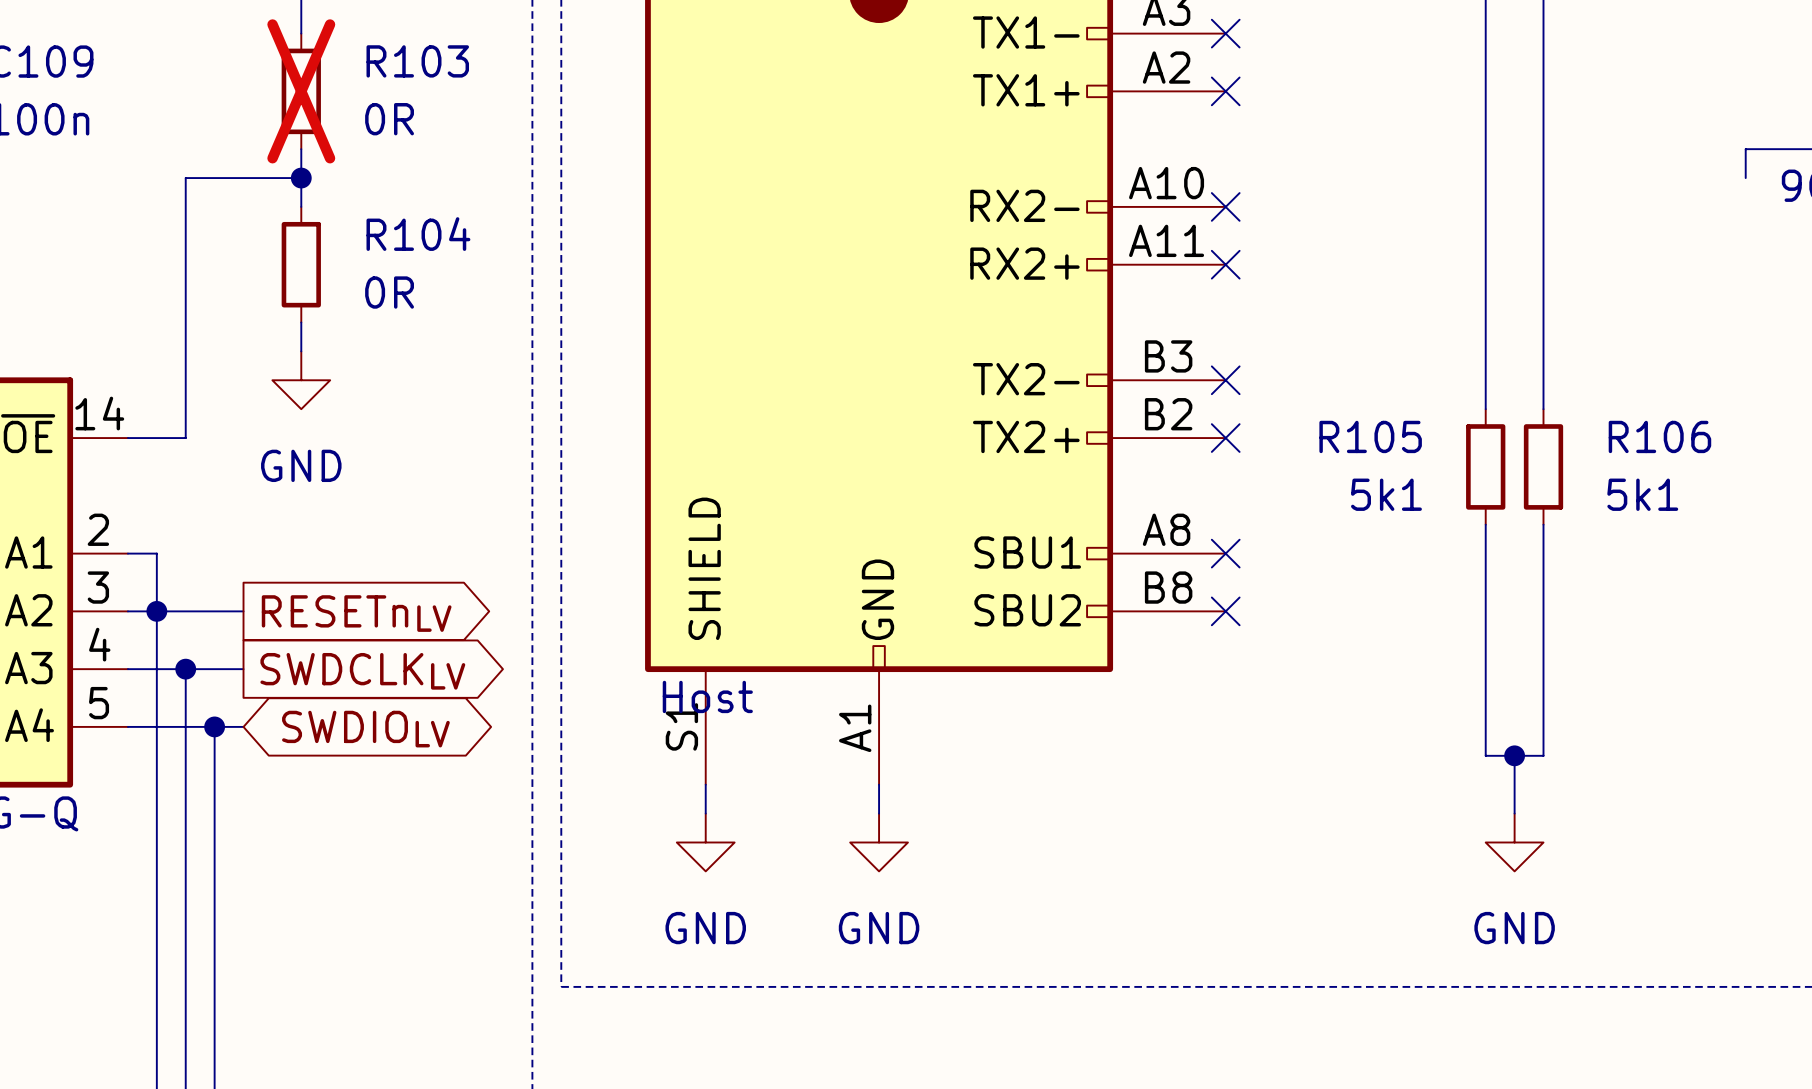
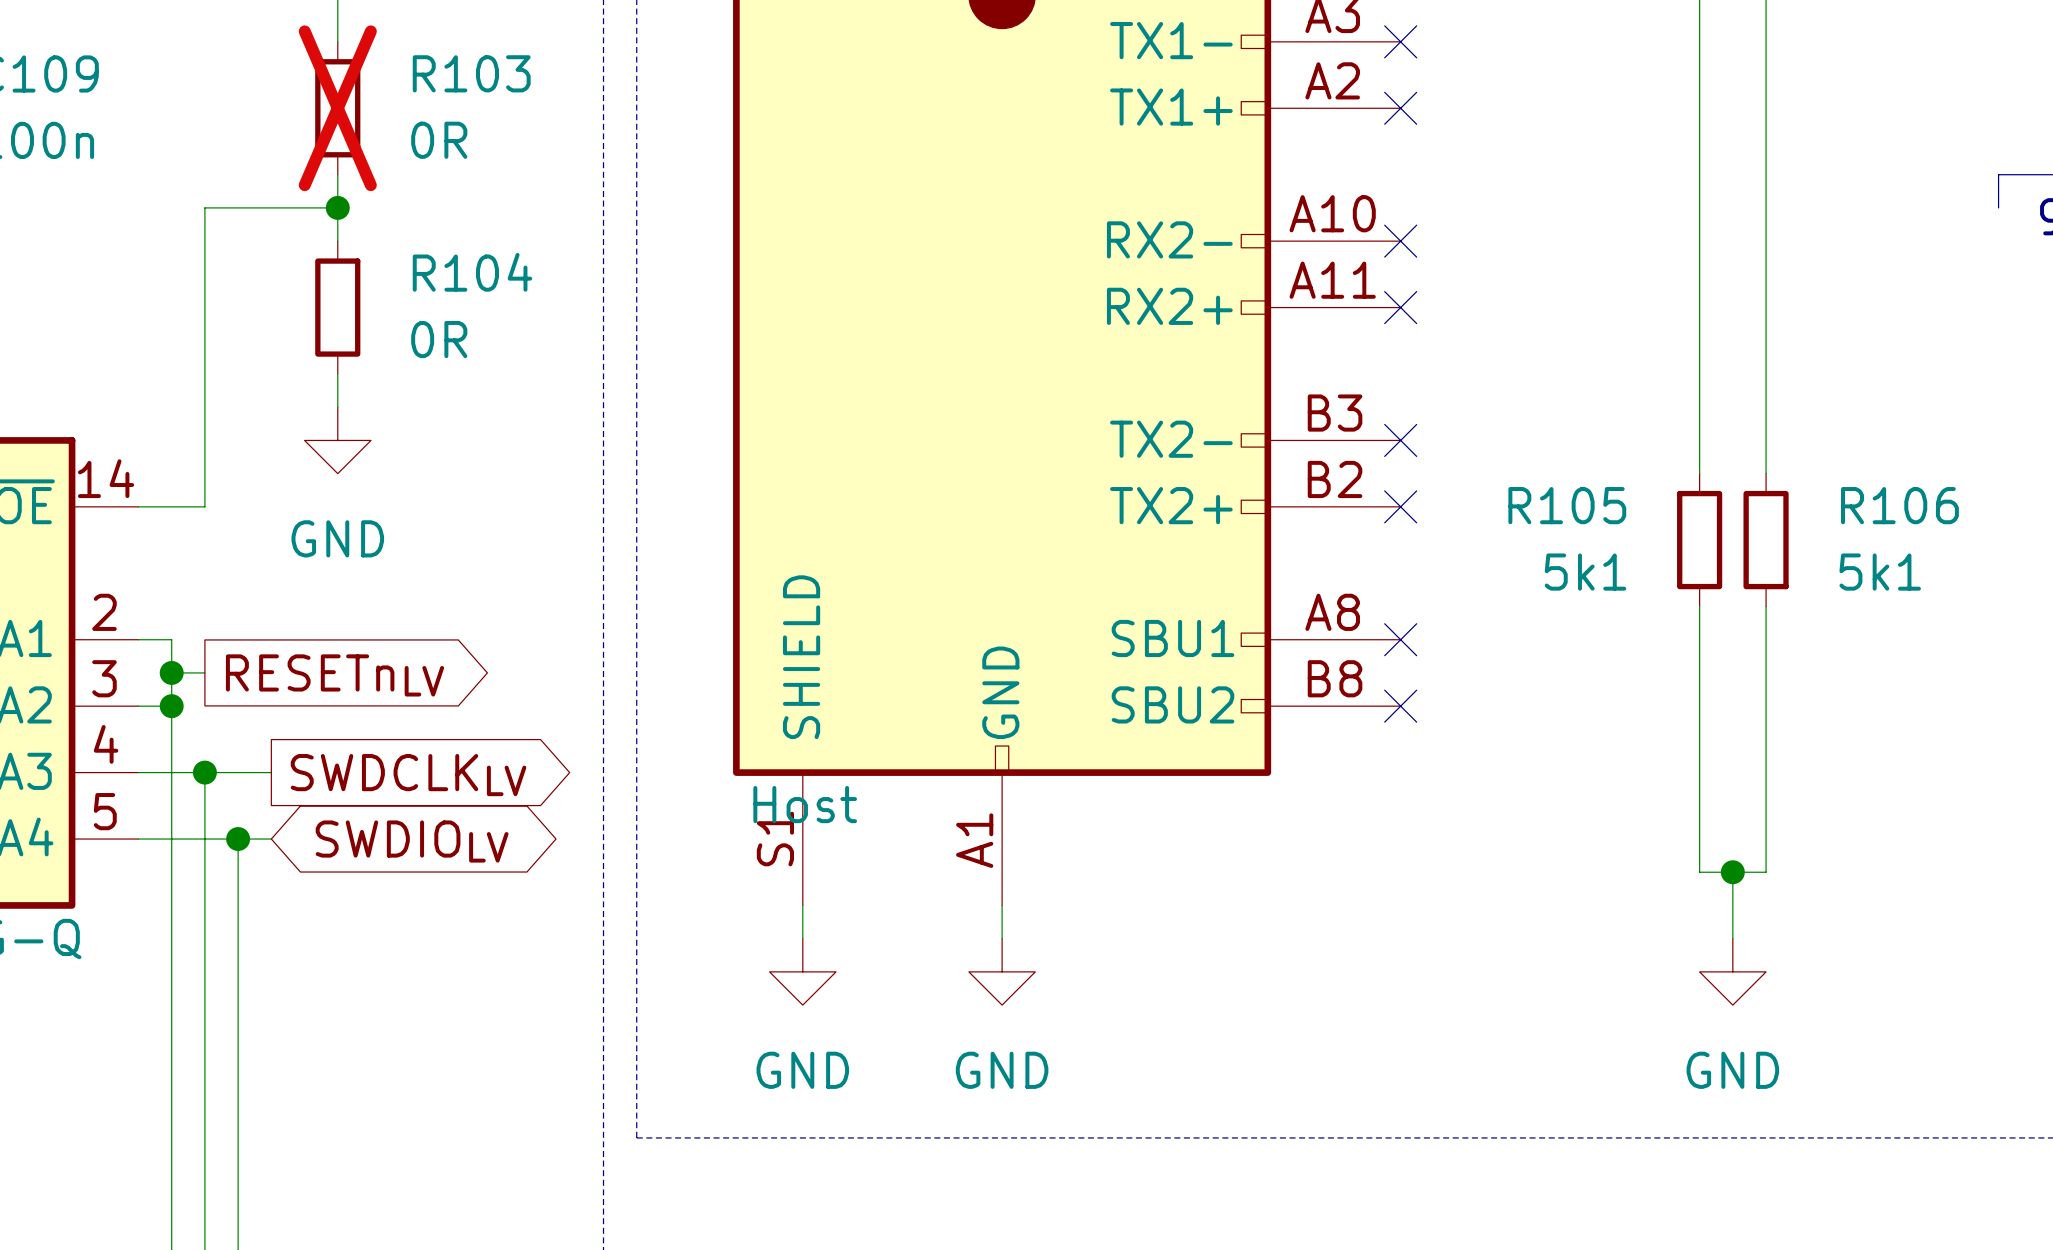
wire: none -> (171, 672) (204, 672)
junction: none -> (171, 672)
wire: (156, 611) (243, 611) -> none
global label position: RESETnLV (356, 613) -> RESETnLV (334, 675)

